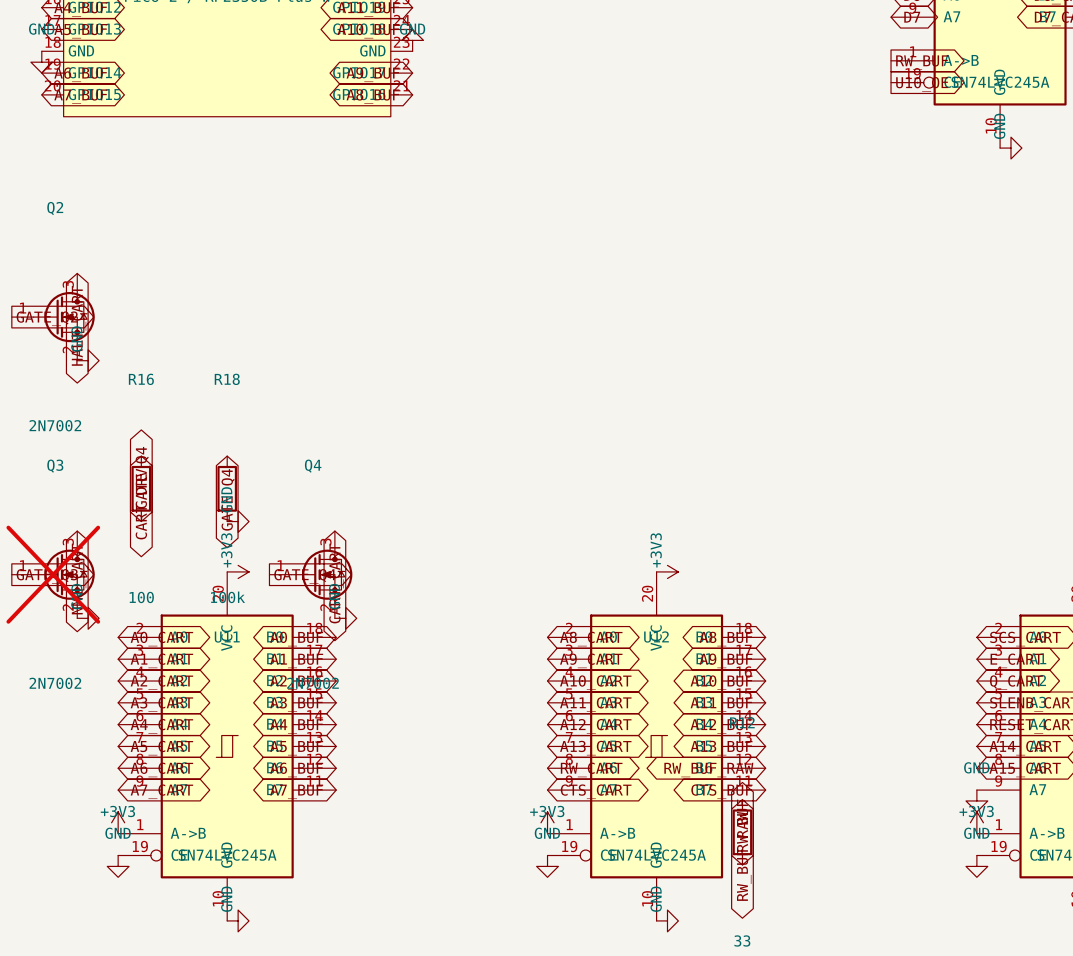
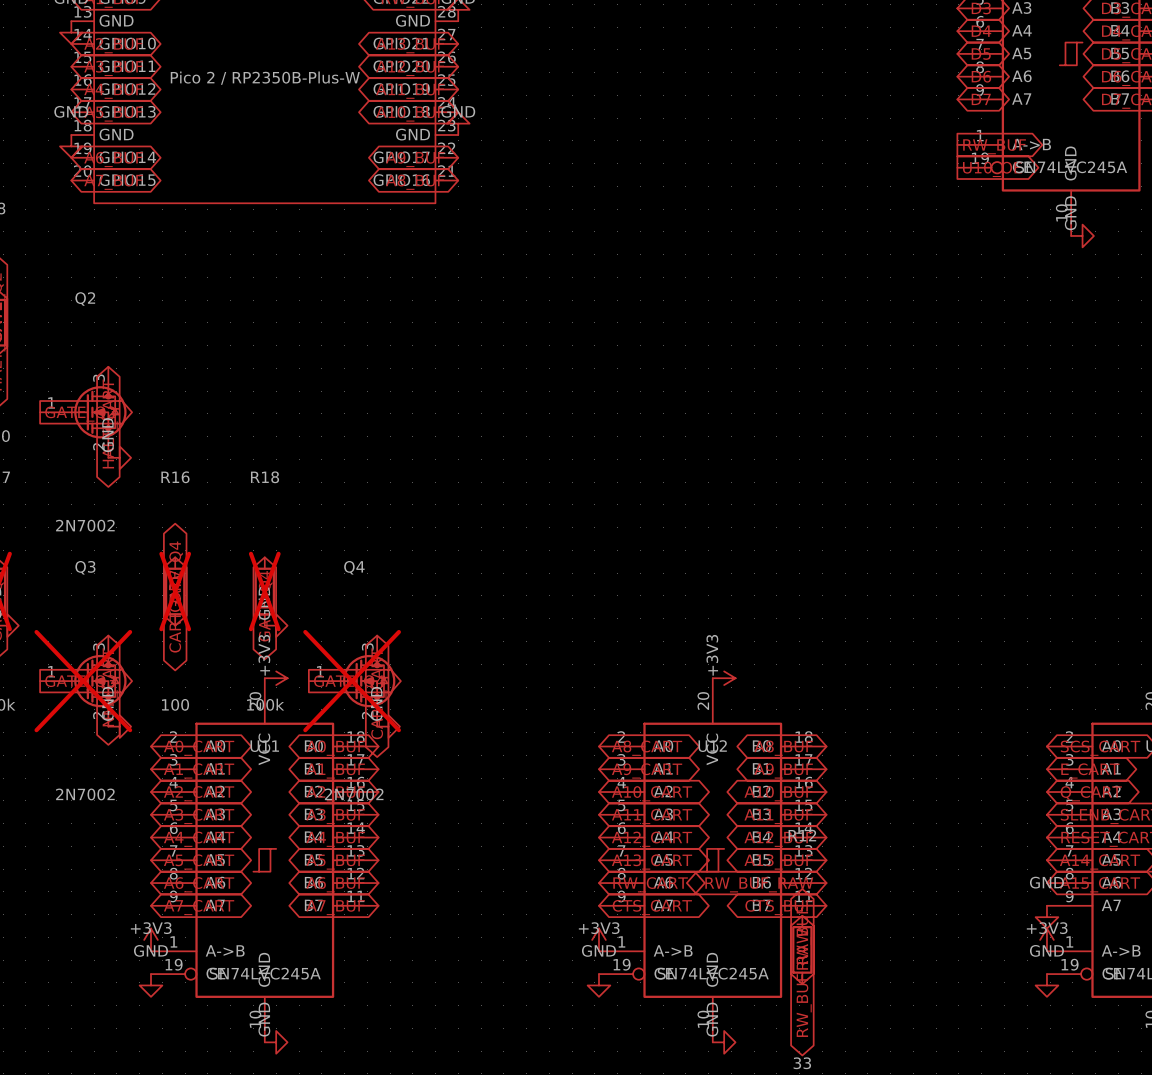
R16 do-not-place cross: none -> (175, 591)
R18 do-not-place cross: none -> (264, 591)
Q4 do-not-place cross: none -> (352, 681)

